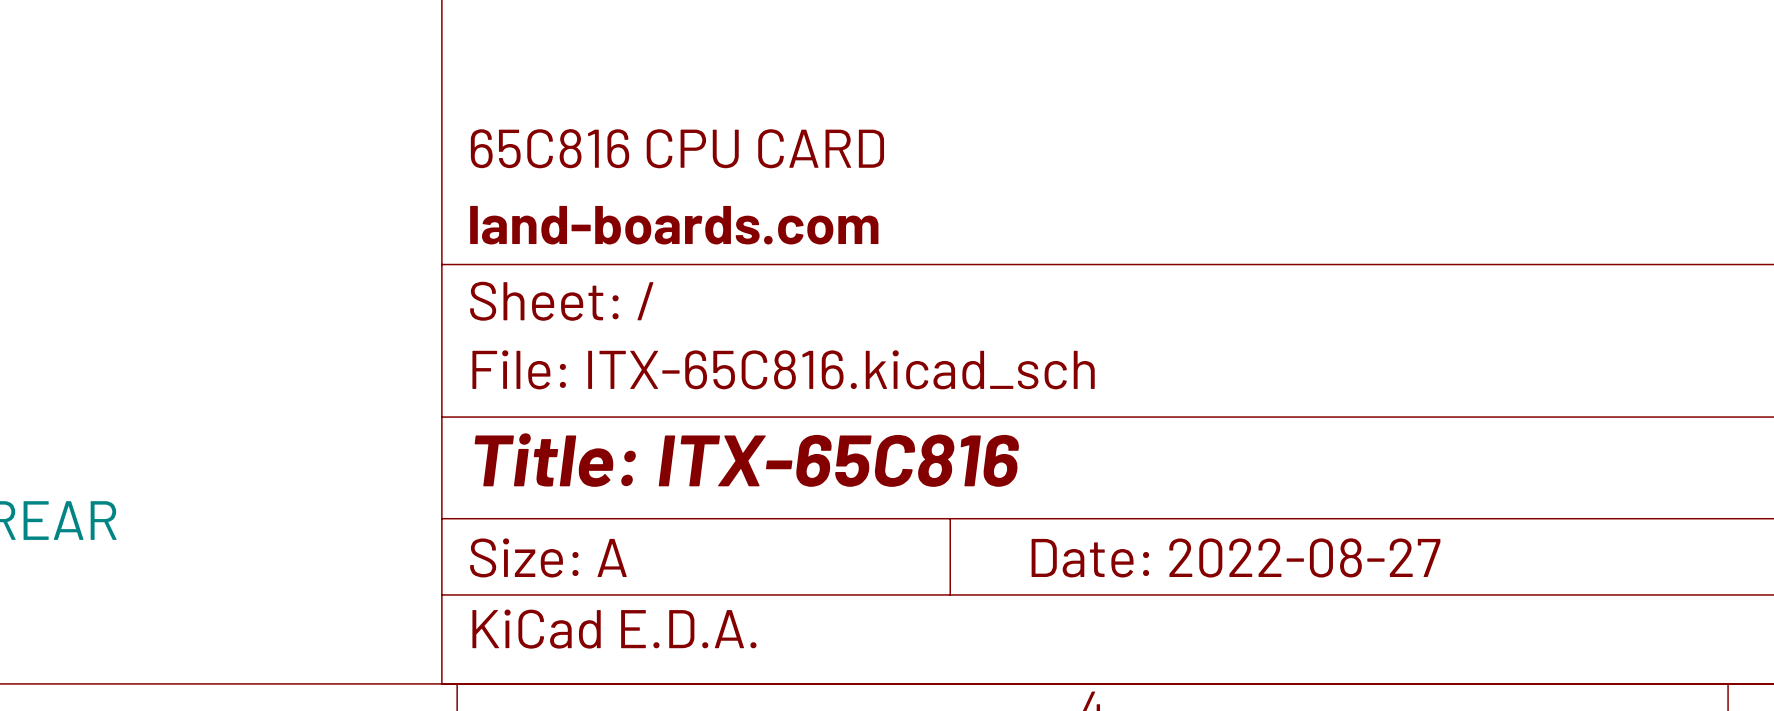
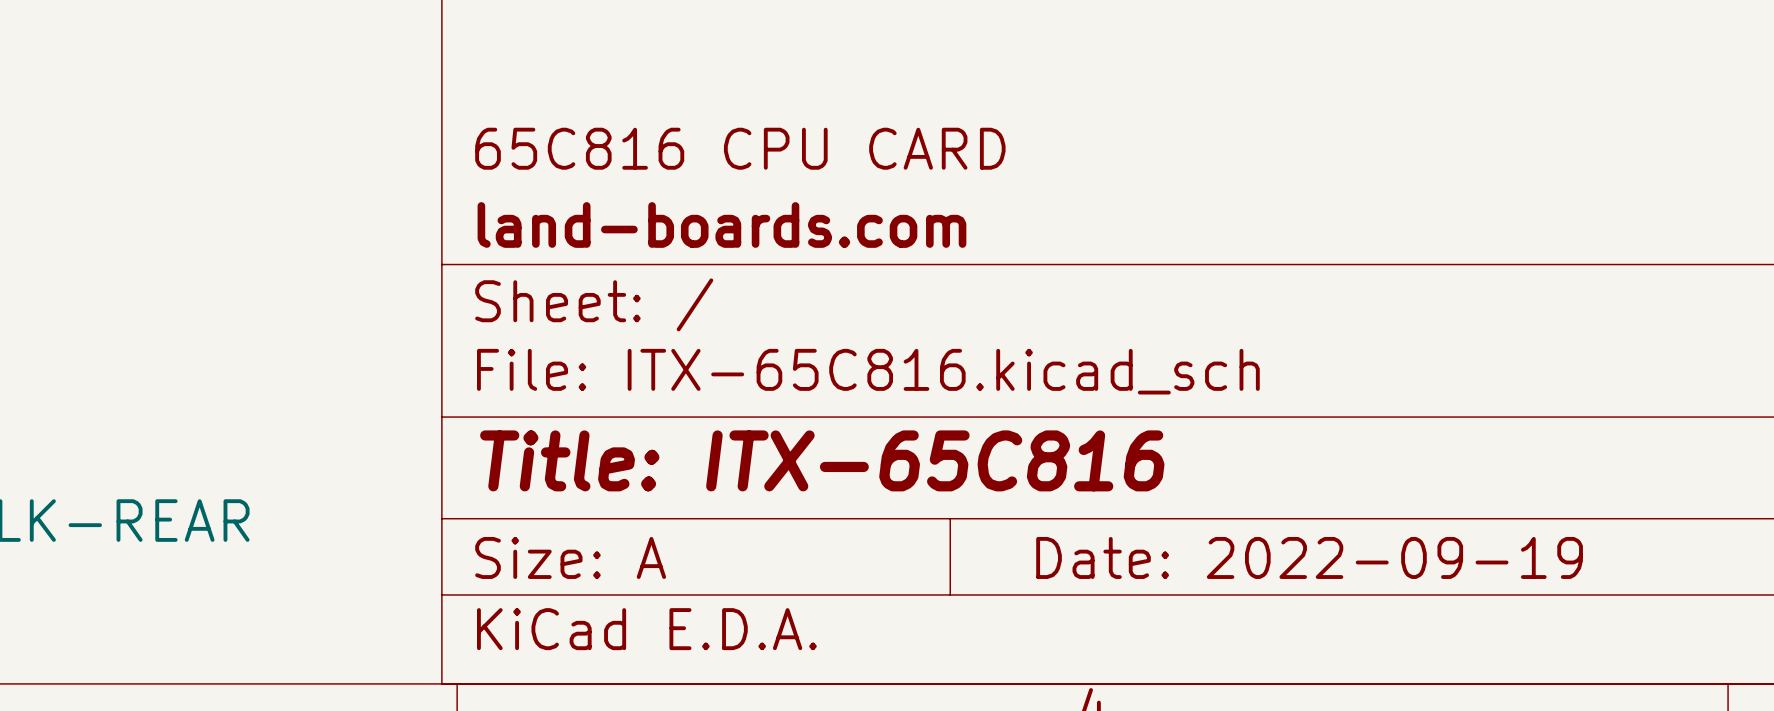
title block: Date: 2022-08-27 (1236, 557) -> Date: 2022-09-19 (1309, 557)

